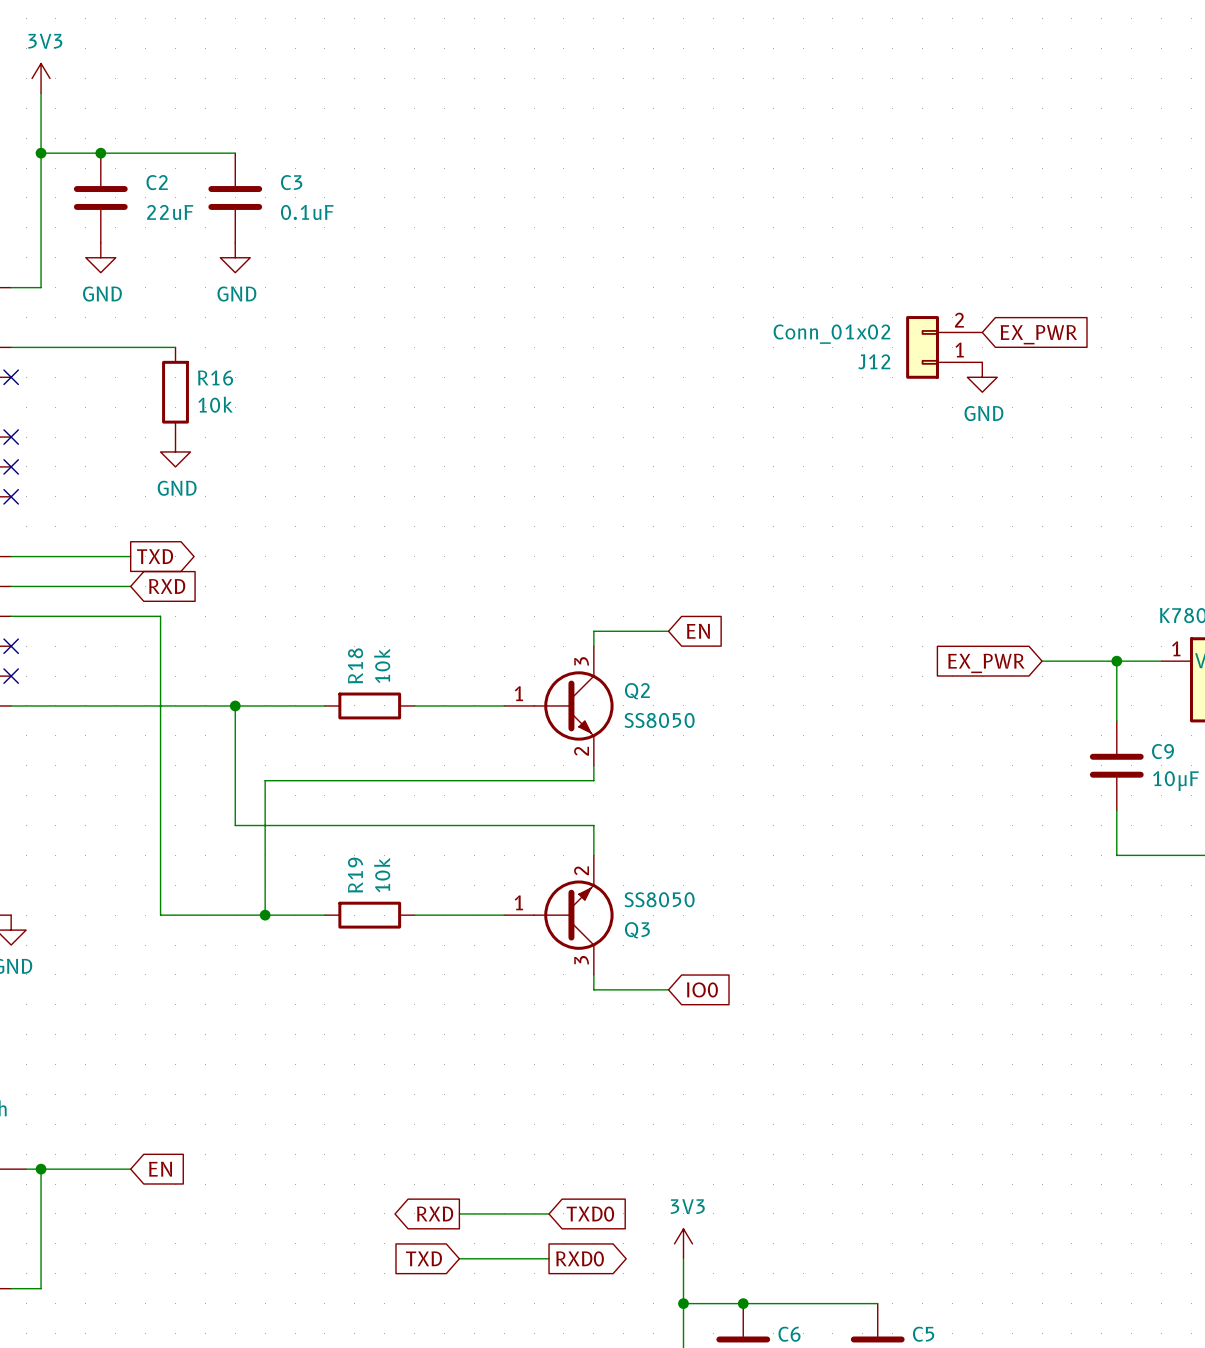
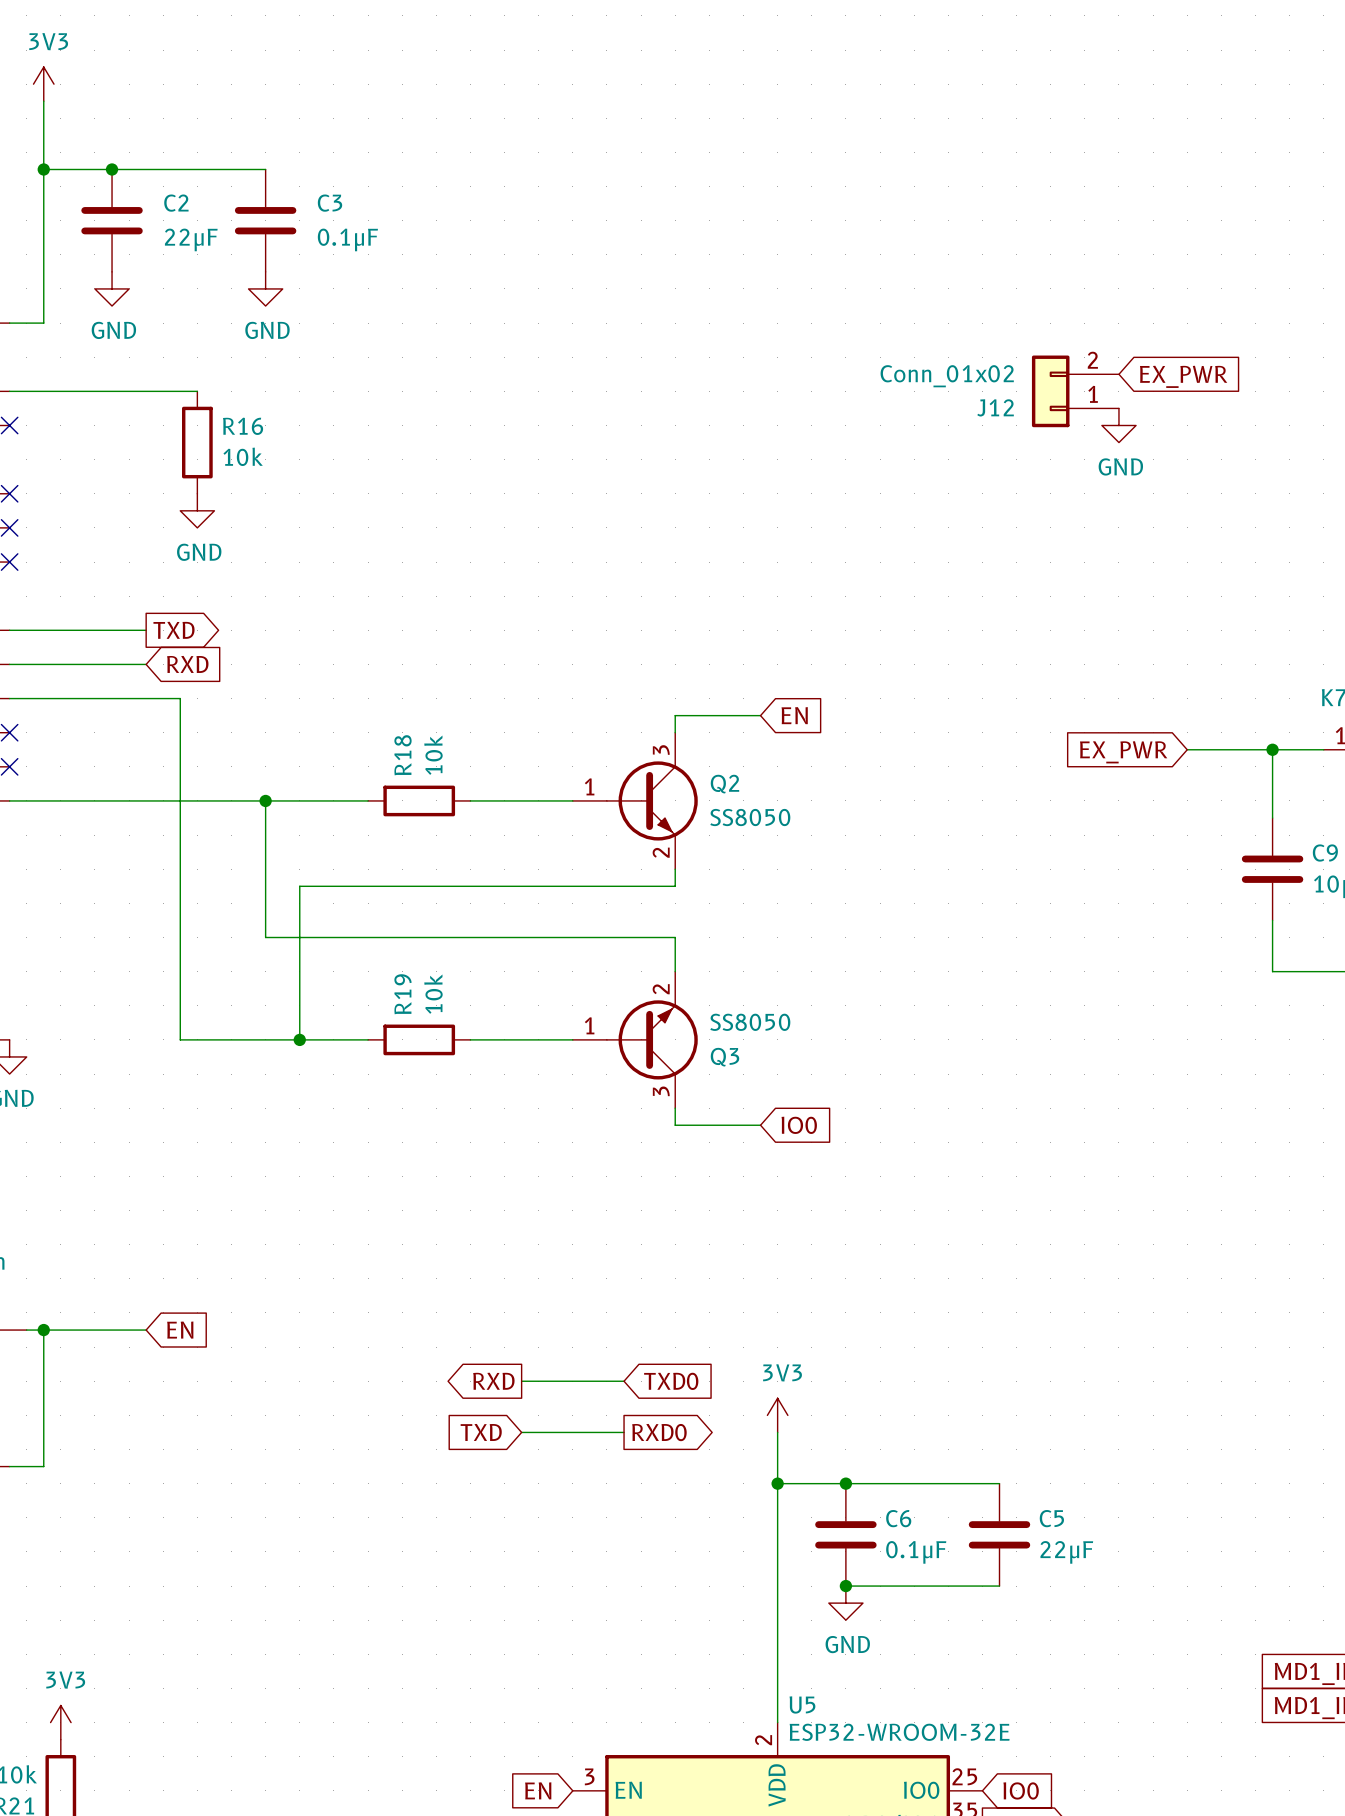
C2 value: 22uF (170, 212) -> 22μF (191, 239)
C3 value: 0.1uF (307, 212) -> 0.1μF (347, 239)

